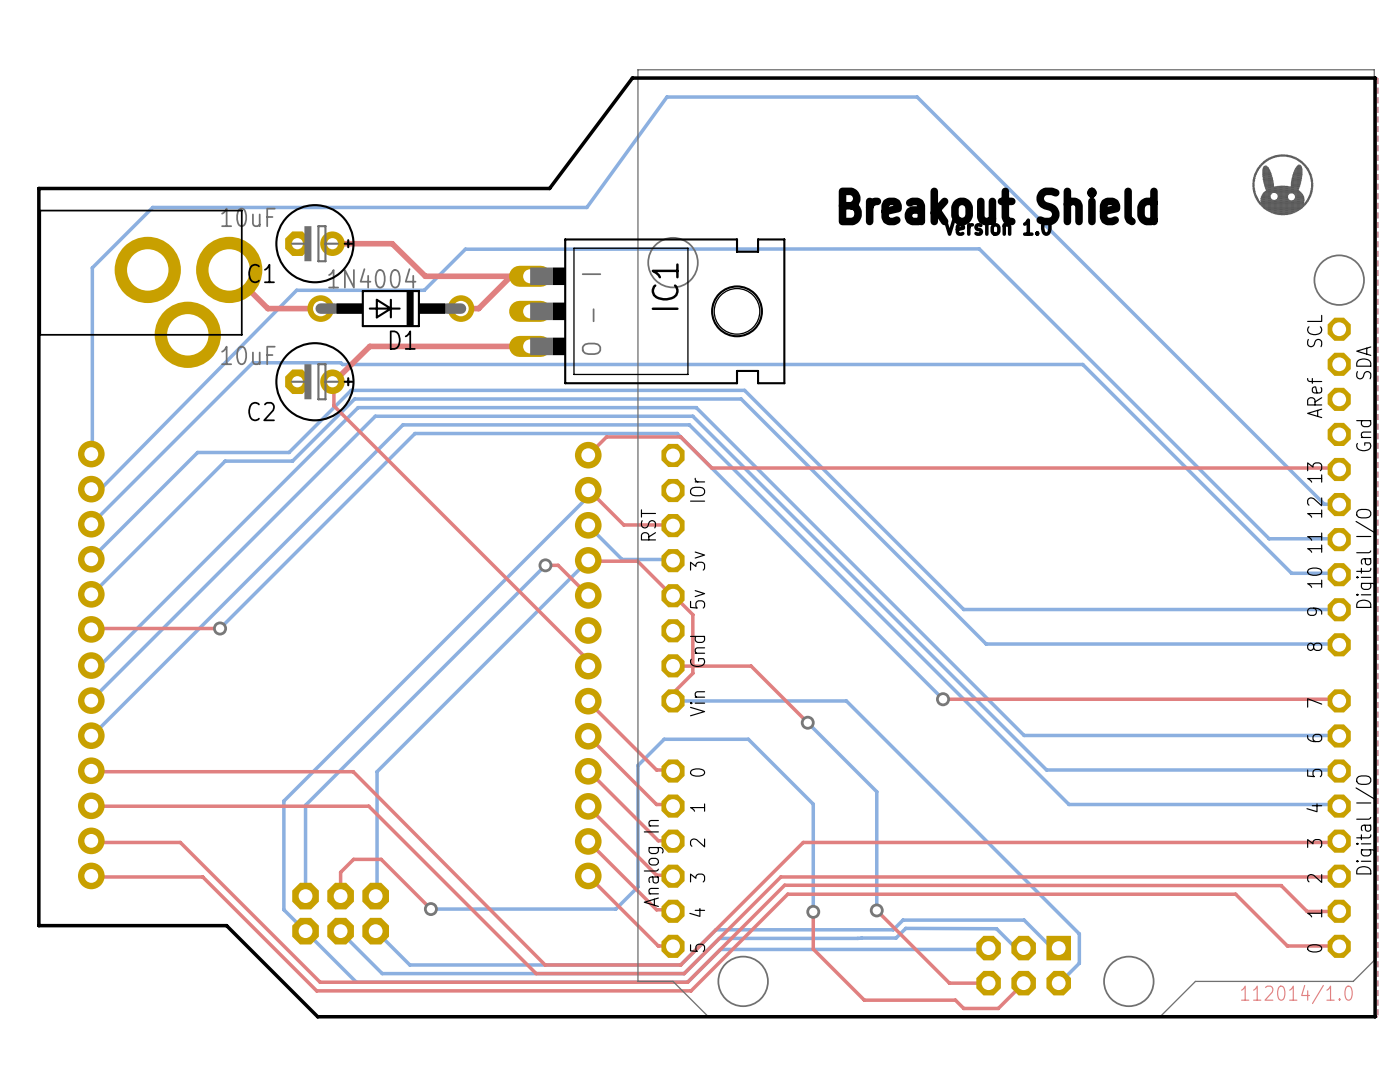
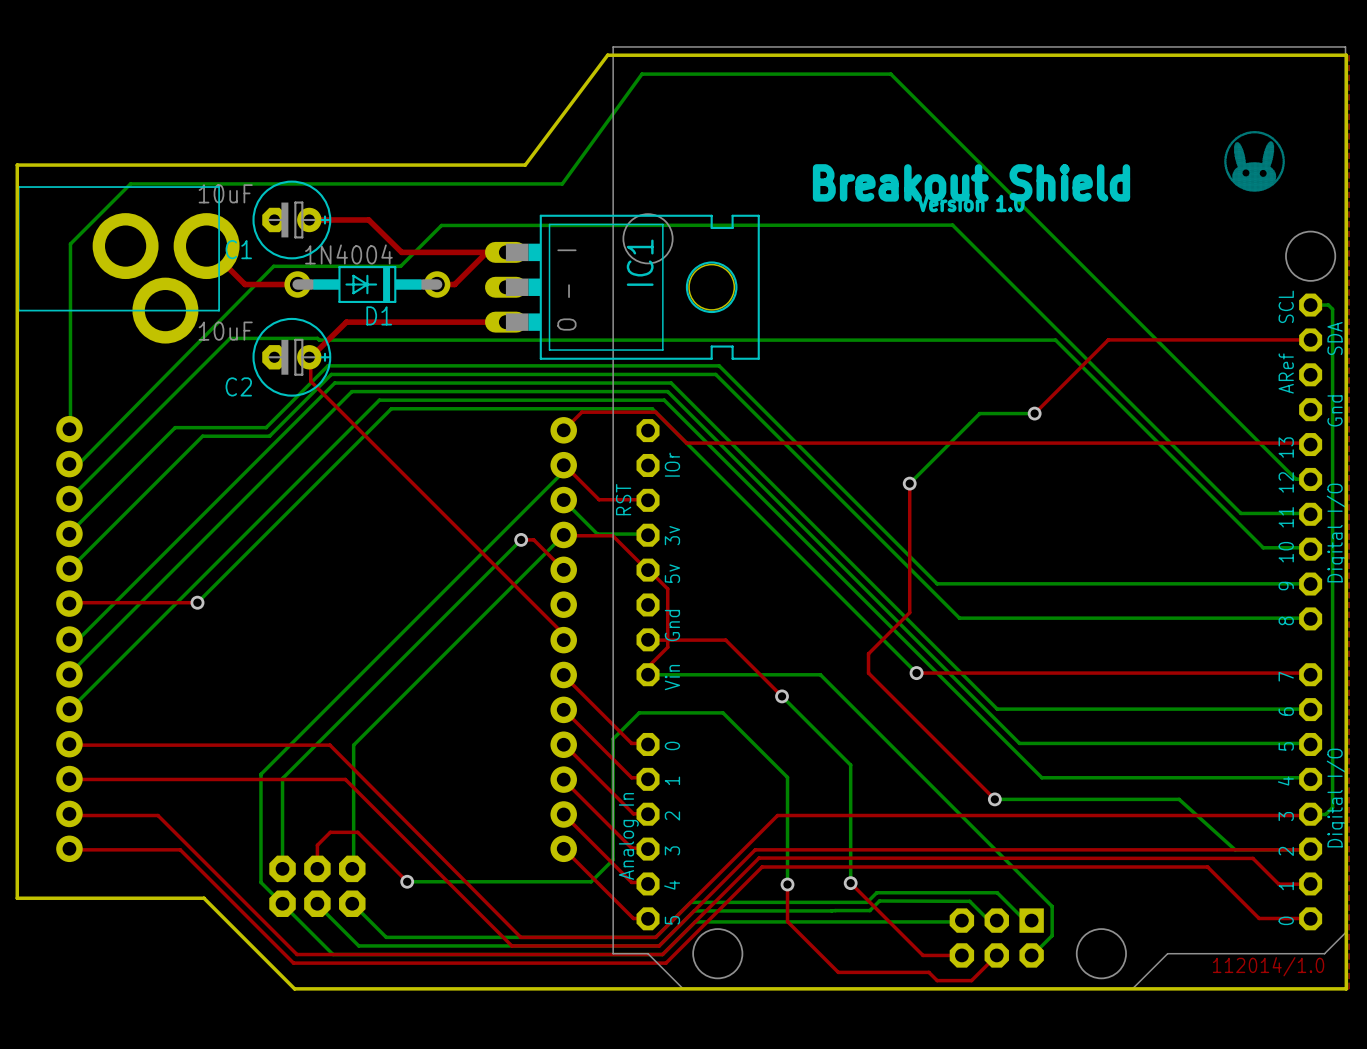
bottom track: none -> (1310, 305) (1328, 305) (1332, 309) (1332, 807) (1325, 814) (1310, 814)
top track: none -> (1310, 339) (1108, 339) (1034, 413)
bottom track: none -> (1034, 413) (979, 413) (909, 483)
via: none -> (1034, 413)
top track: none -> (909, 483) (909, 612) (868, 653) (868, 673) (994, 799)
via: none -> (909, 483)
bottom track: none -> (994, 799) (1179, 799) (1235, 849) (1310, 849)
via: none -> (994, 799)

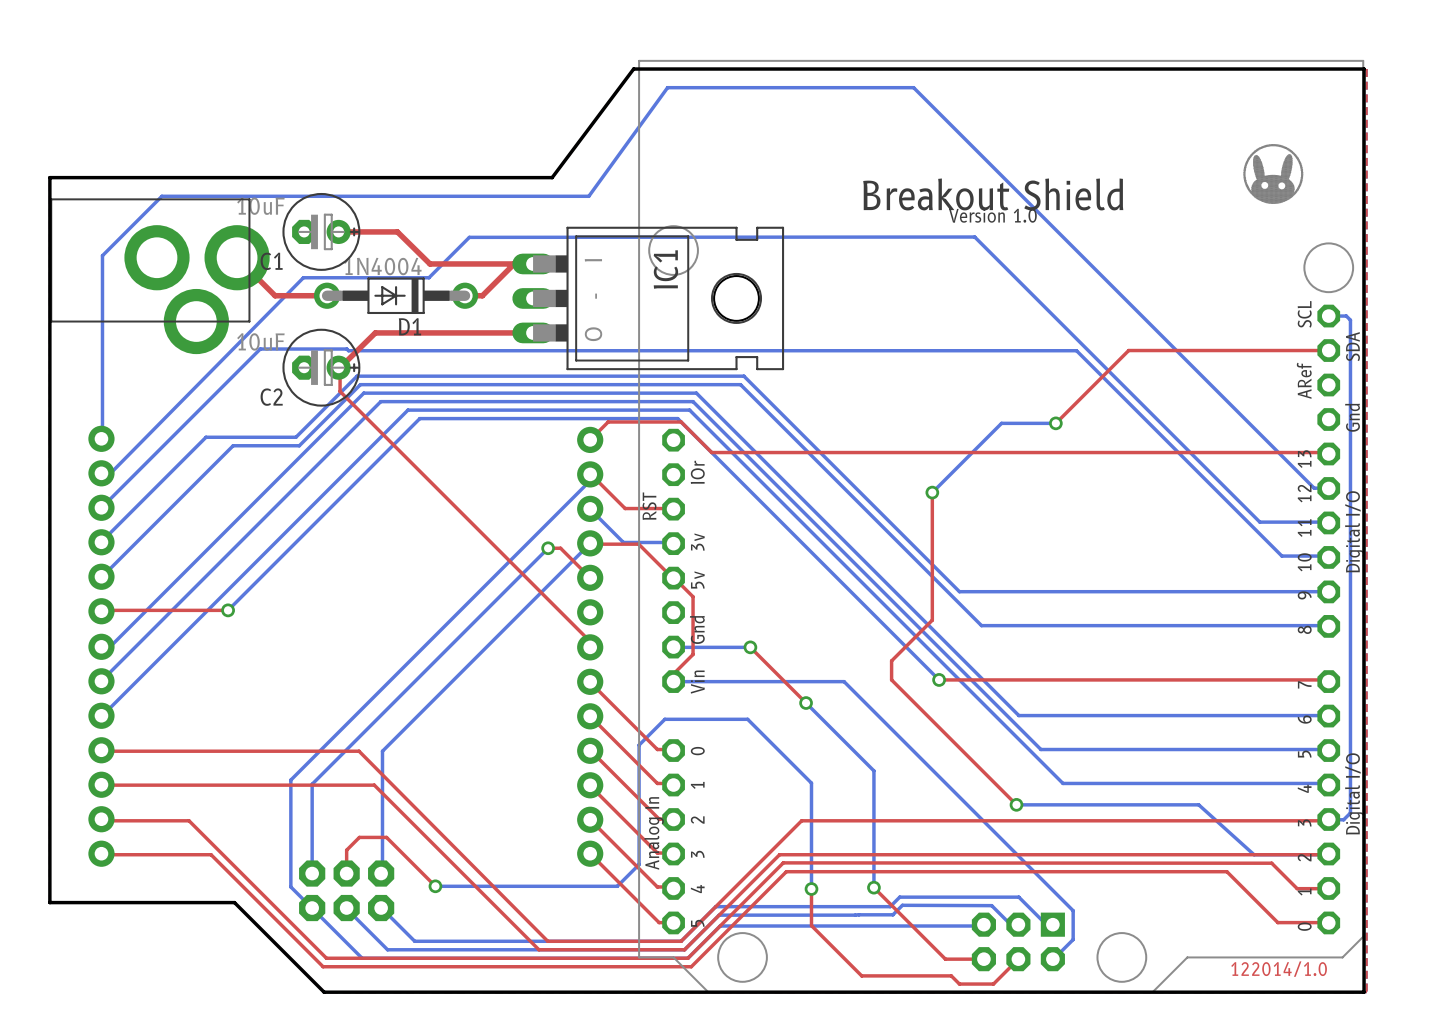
top track: (648, 639) (725, 640) -> none
bottom track: none -> (673, 647) (750, 647)
via: none -> (750, 647)
text: 112014/1.0 (1268, 966) -> 122014/1.0 (1279, 969)

